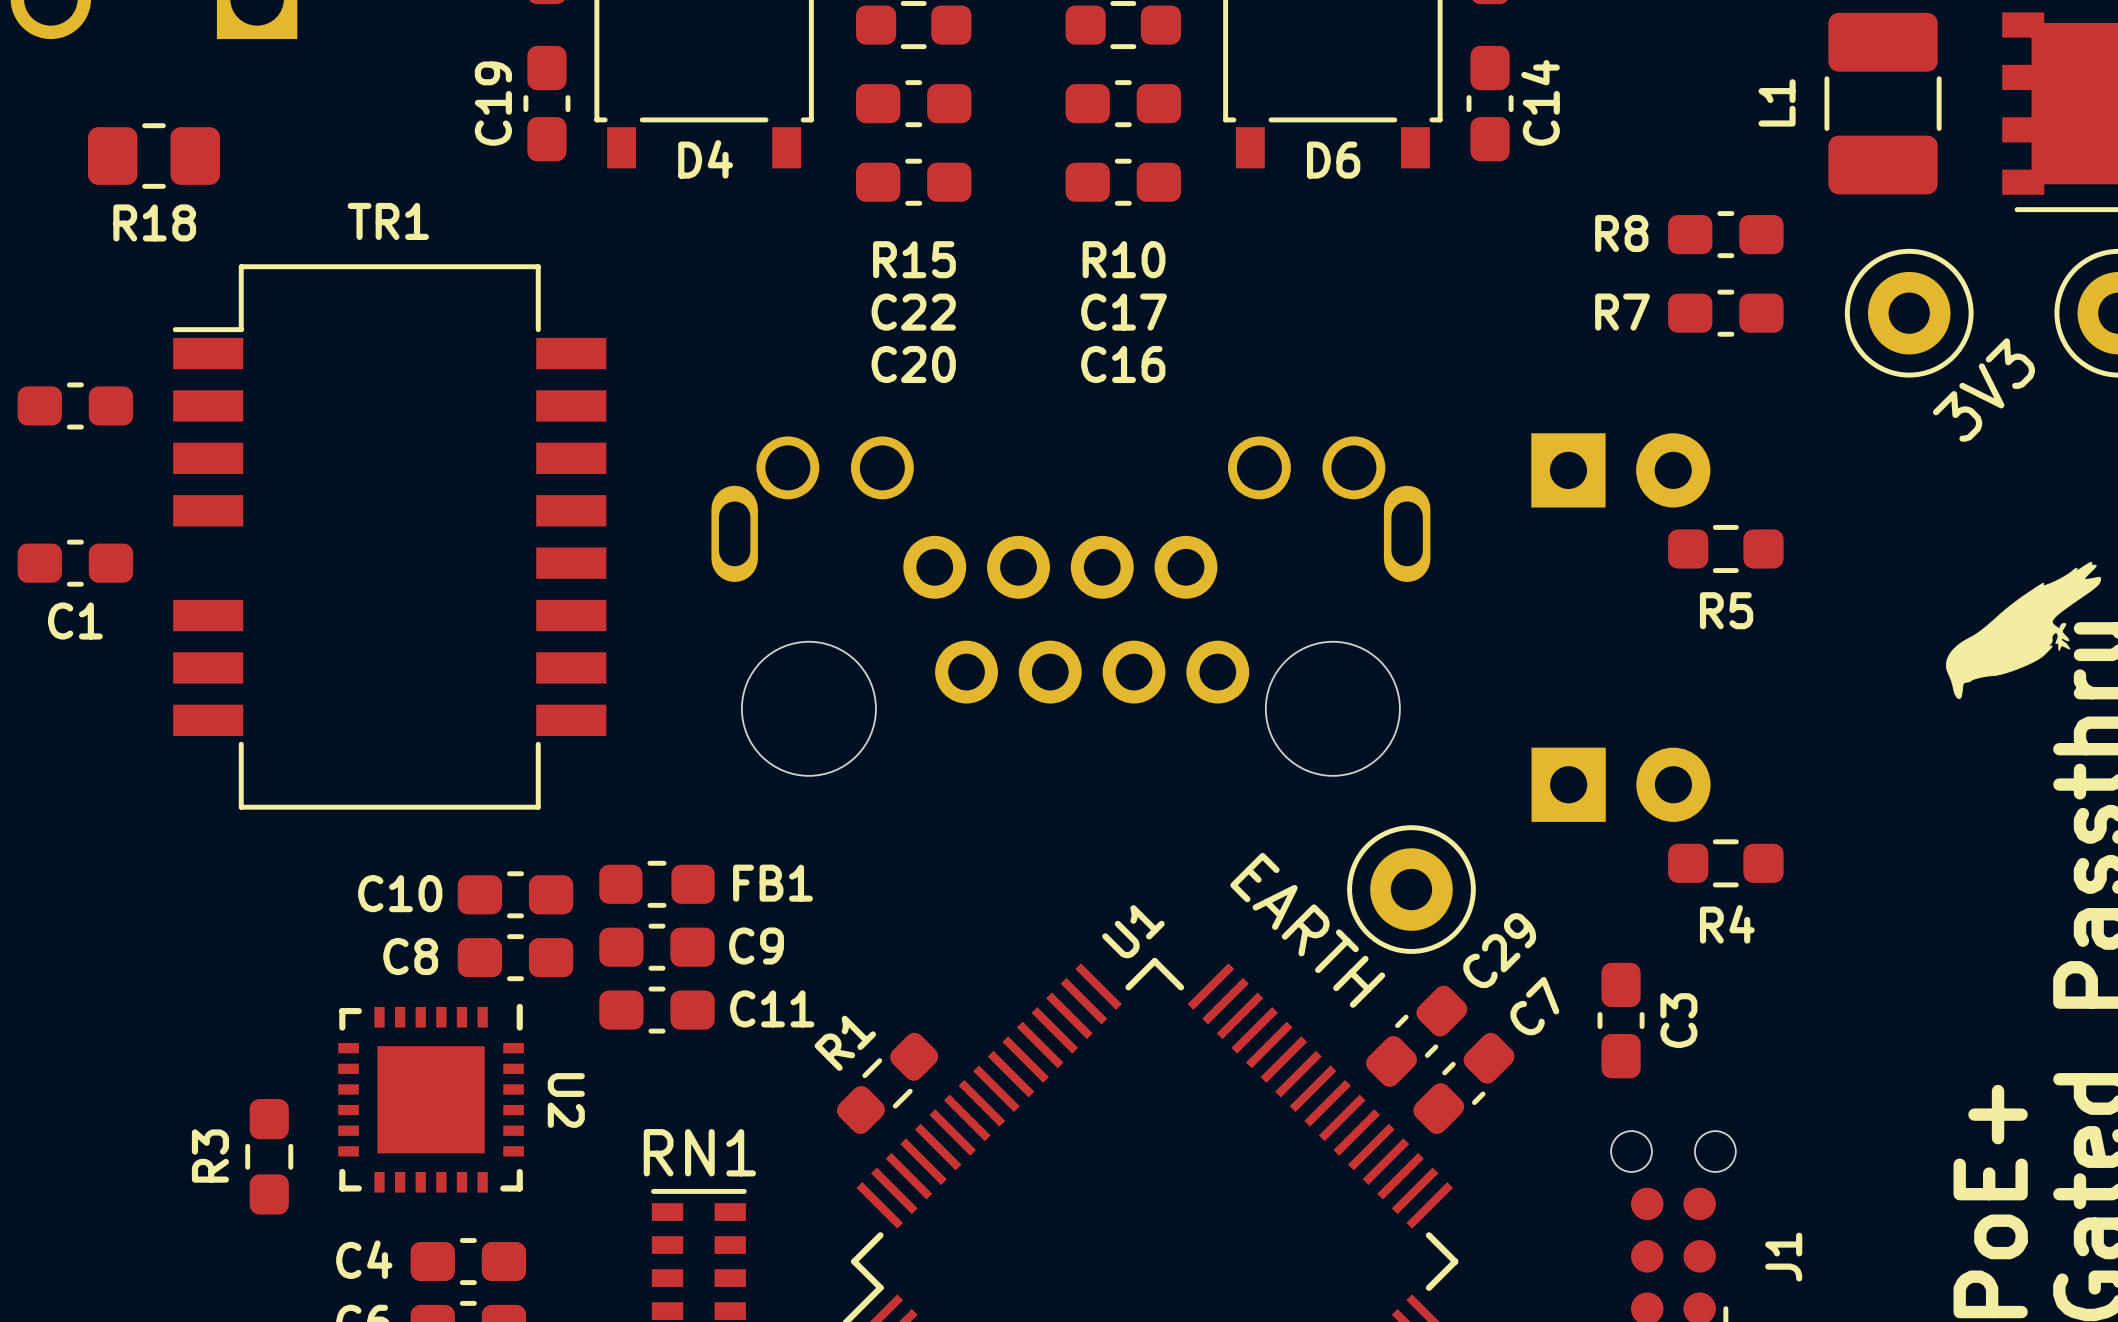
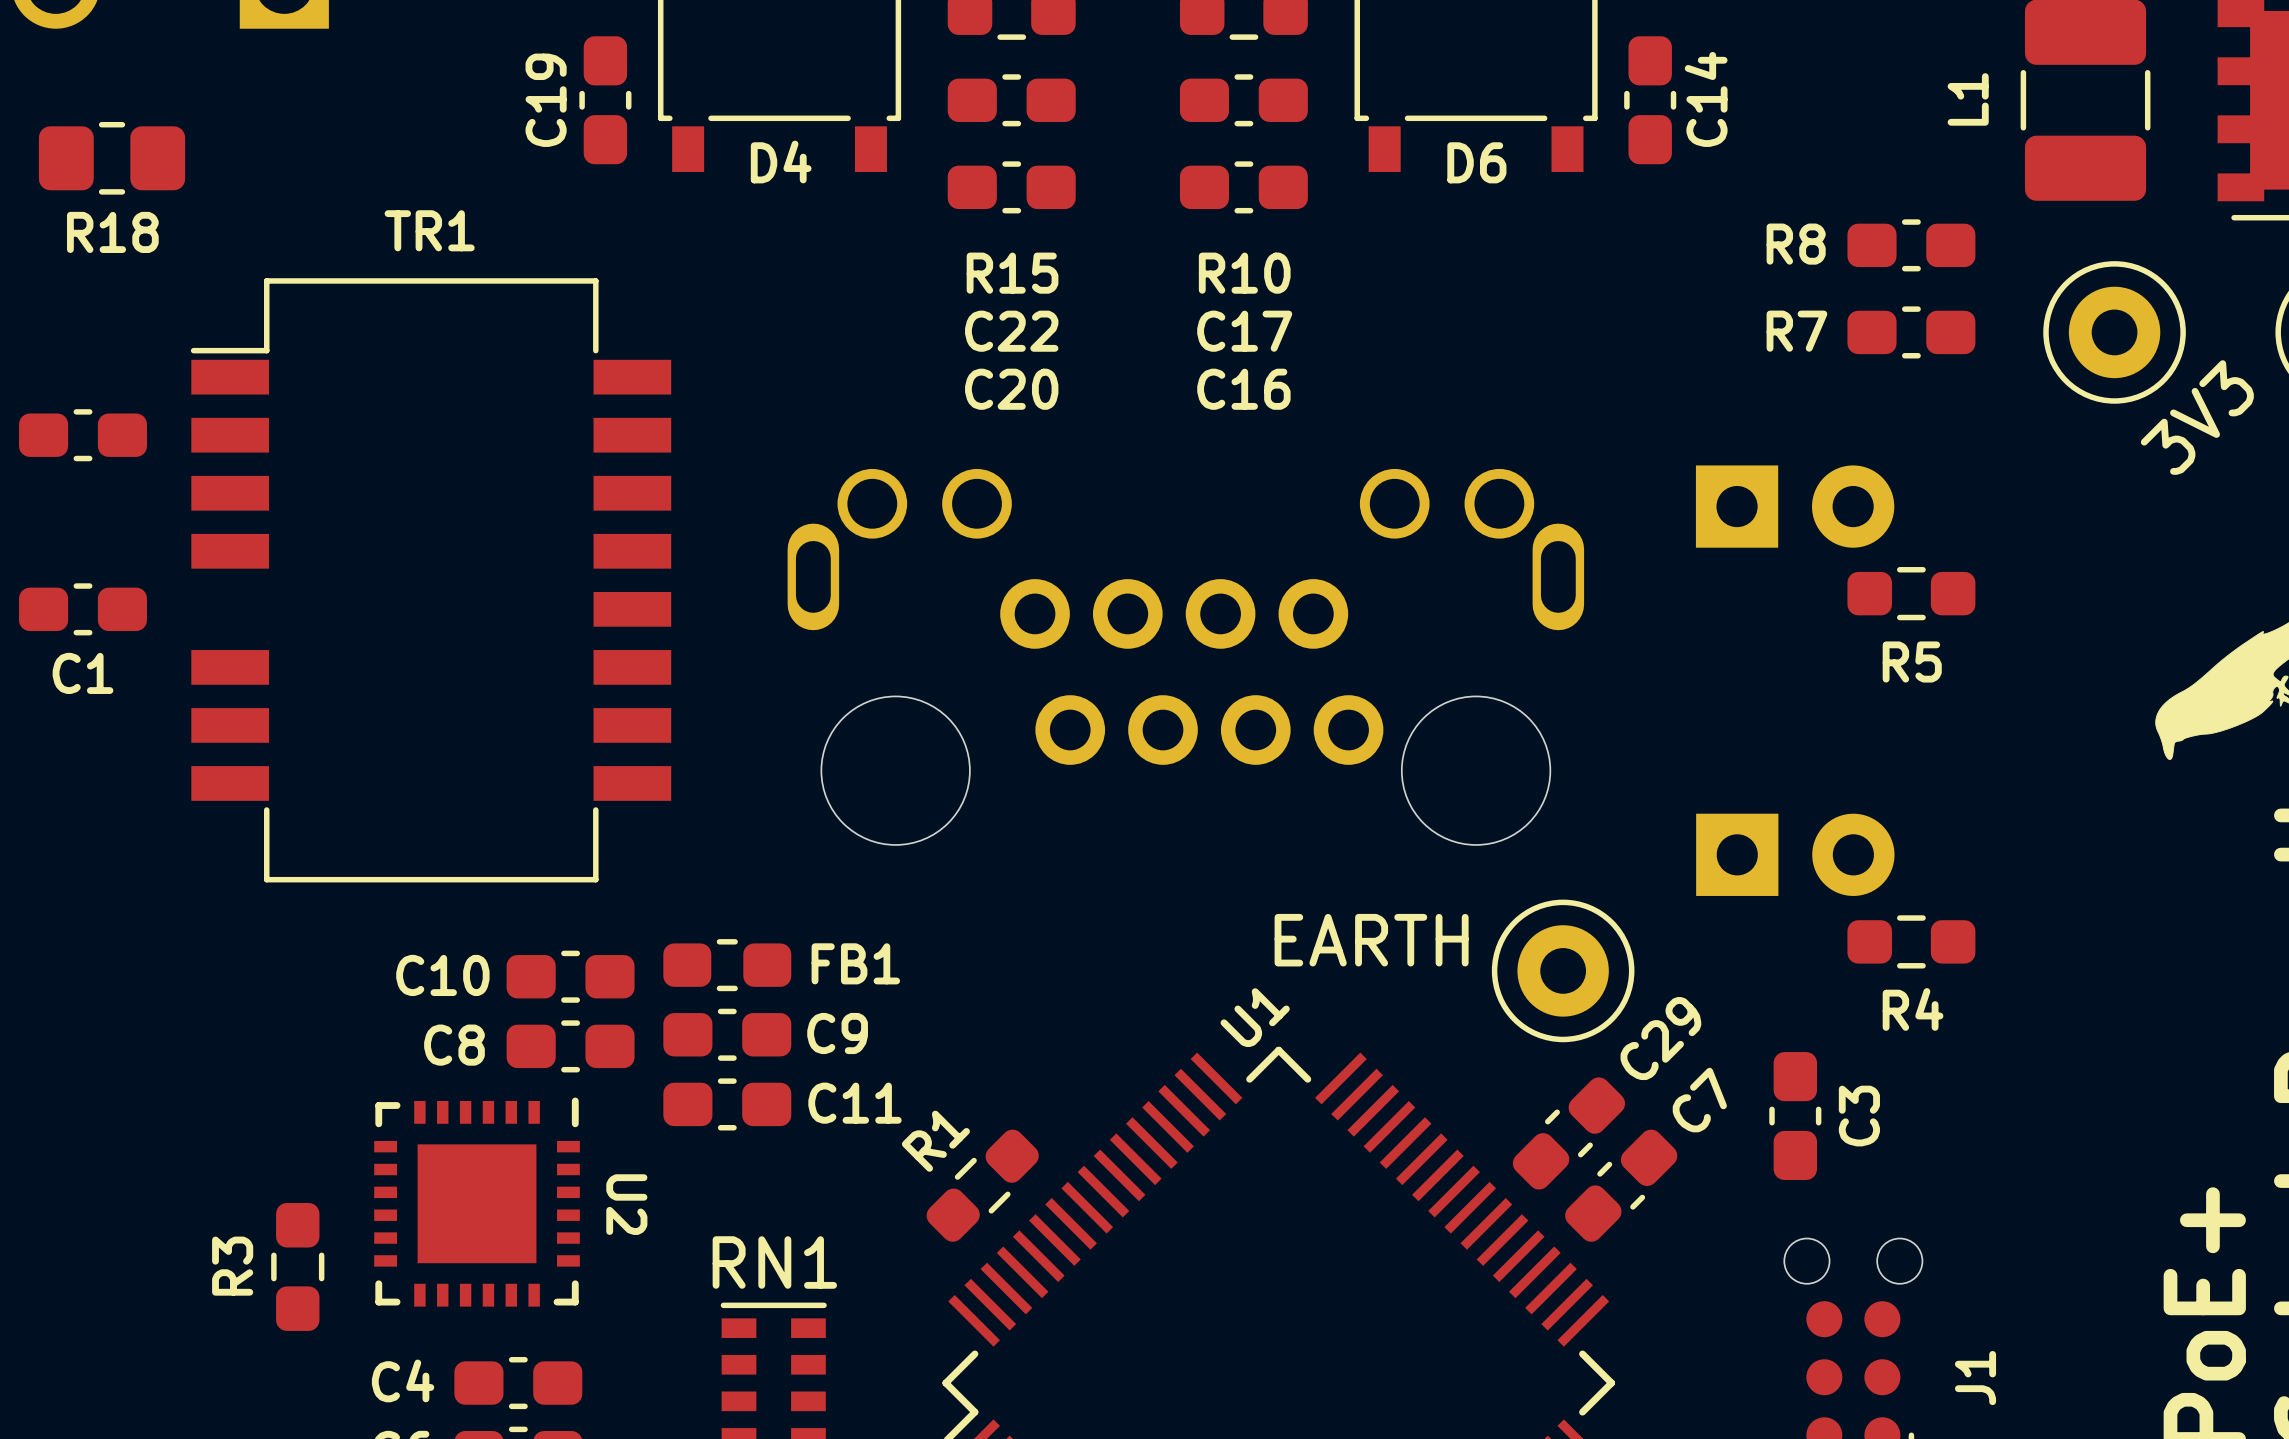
R18 position: (153, 156) -> (112, 158)
part value rotation: 0° (1307, 930) -> 45° counterclockwise (1371, 940)

